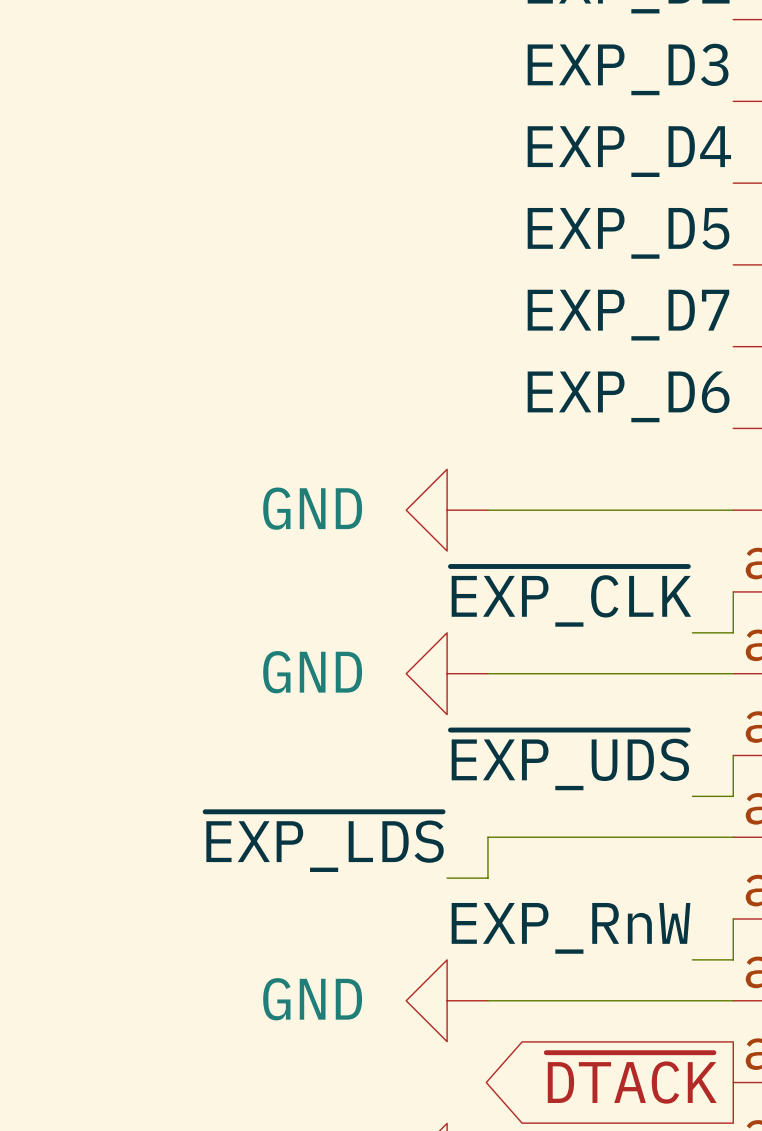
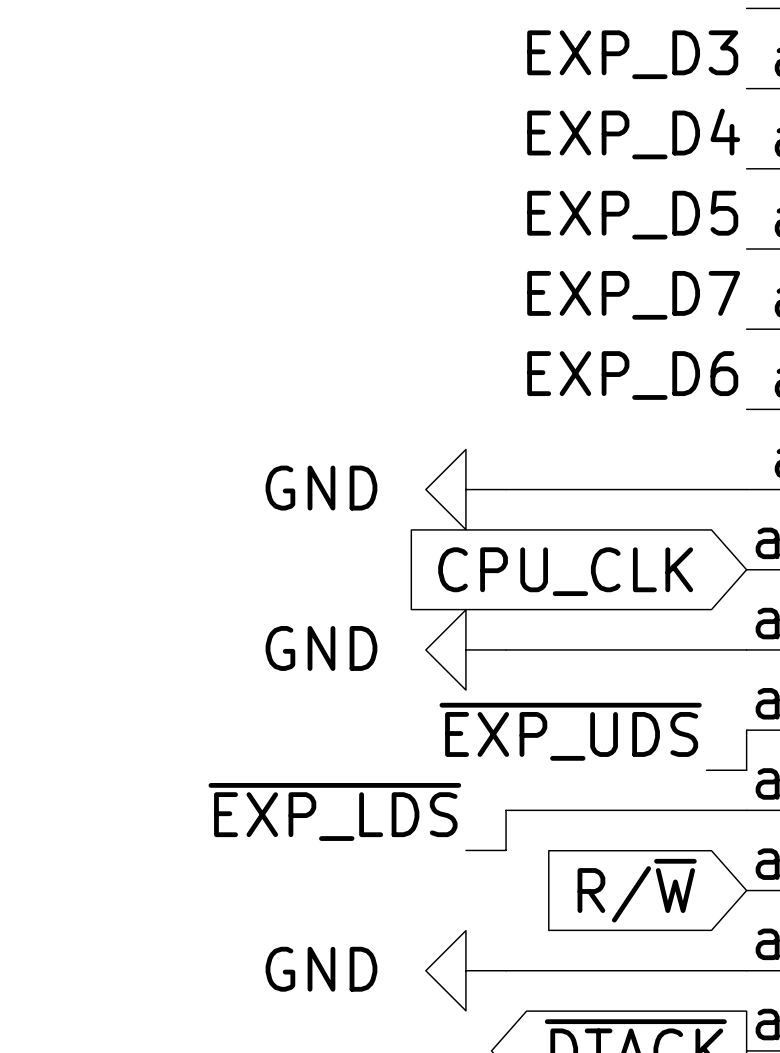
wire: (733, 591) (733, 632) (692, 632) -> none
global label: none -> CPU_CLK (565, 571)
label: ~{EXP_CLK} (570, 596) -> none
global label: none -> R/~{W} (637, 890)
wire: (733, 919) (733, 959) (692, 959) -> none
label: EXP_RnW (571, 928) -> none

